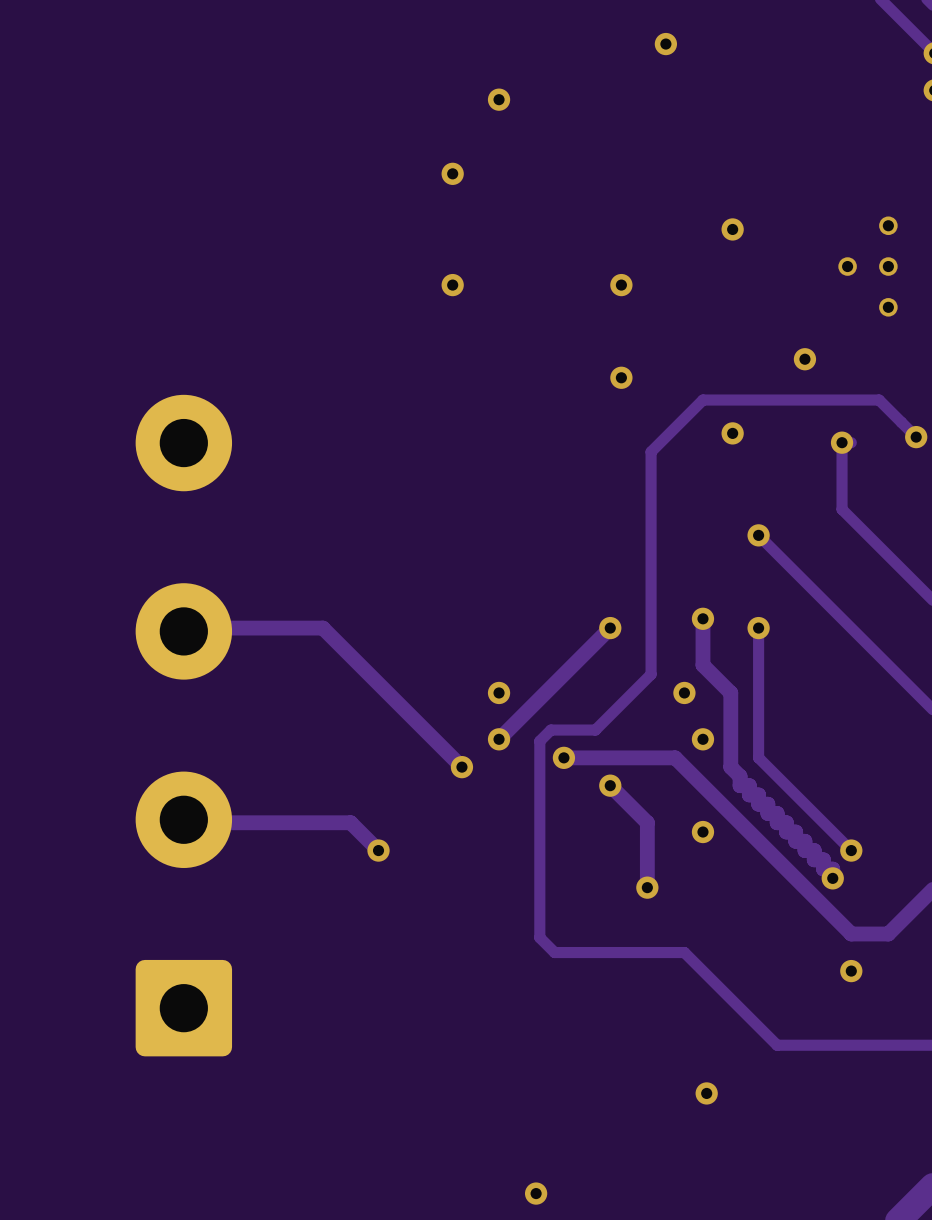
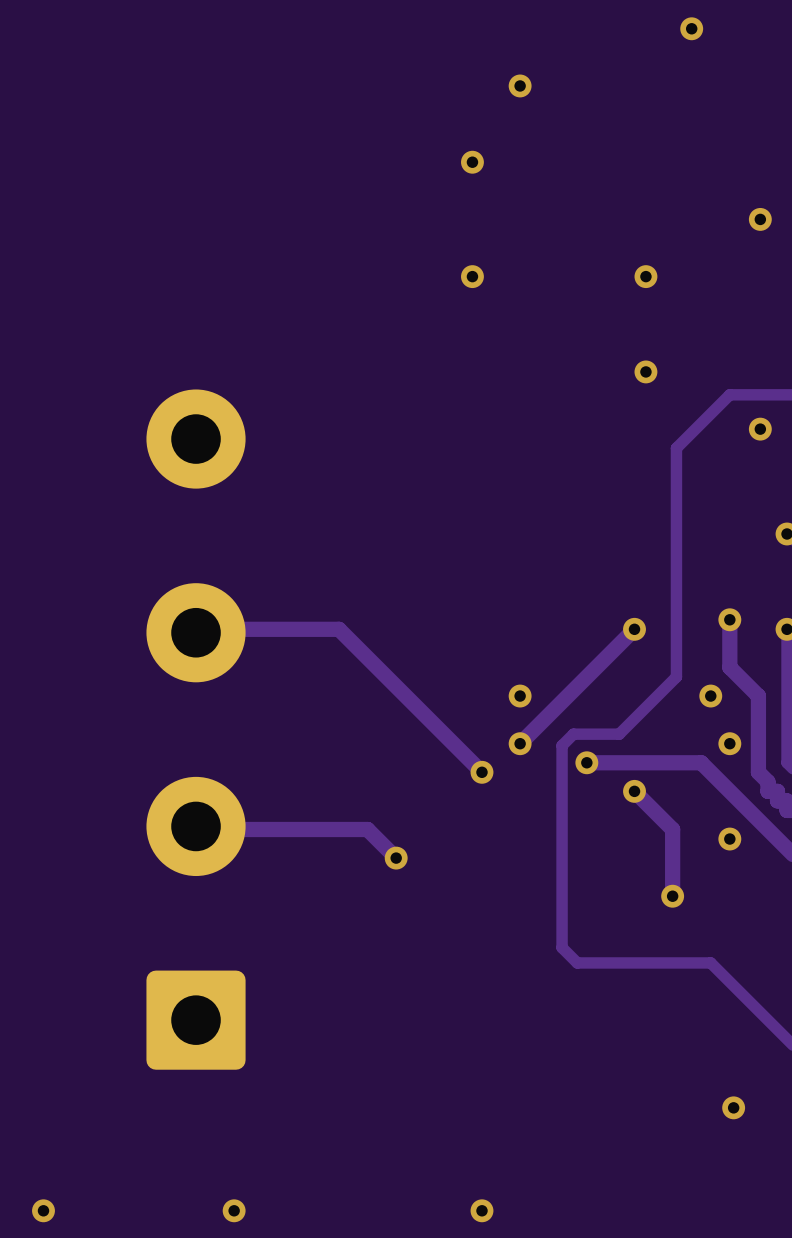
via: none -> (43, 1210)
via: none -> (234, 1210)
via position: (536, 1193) -> (481, 1210)

